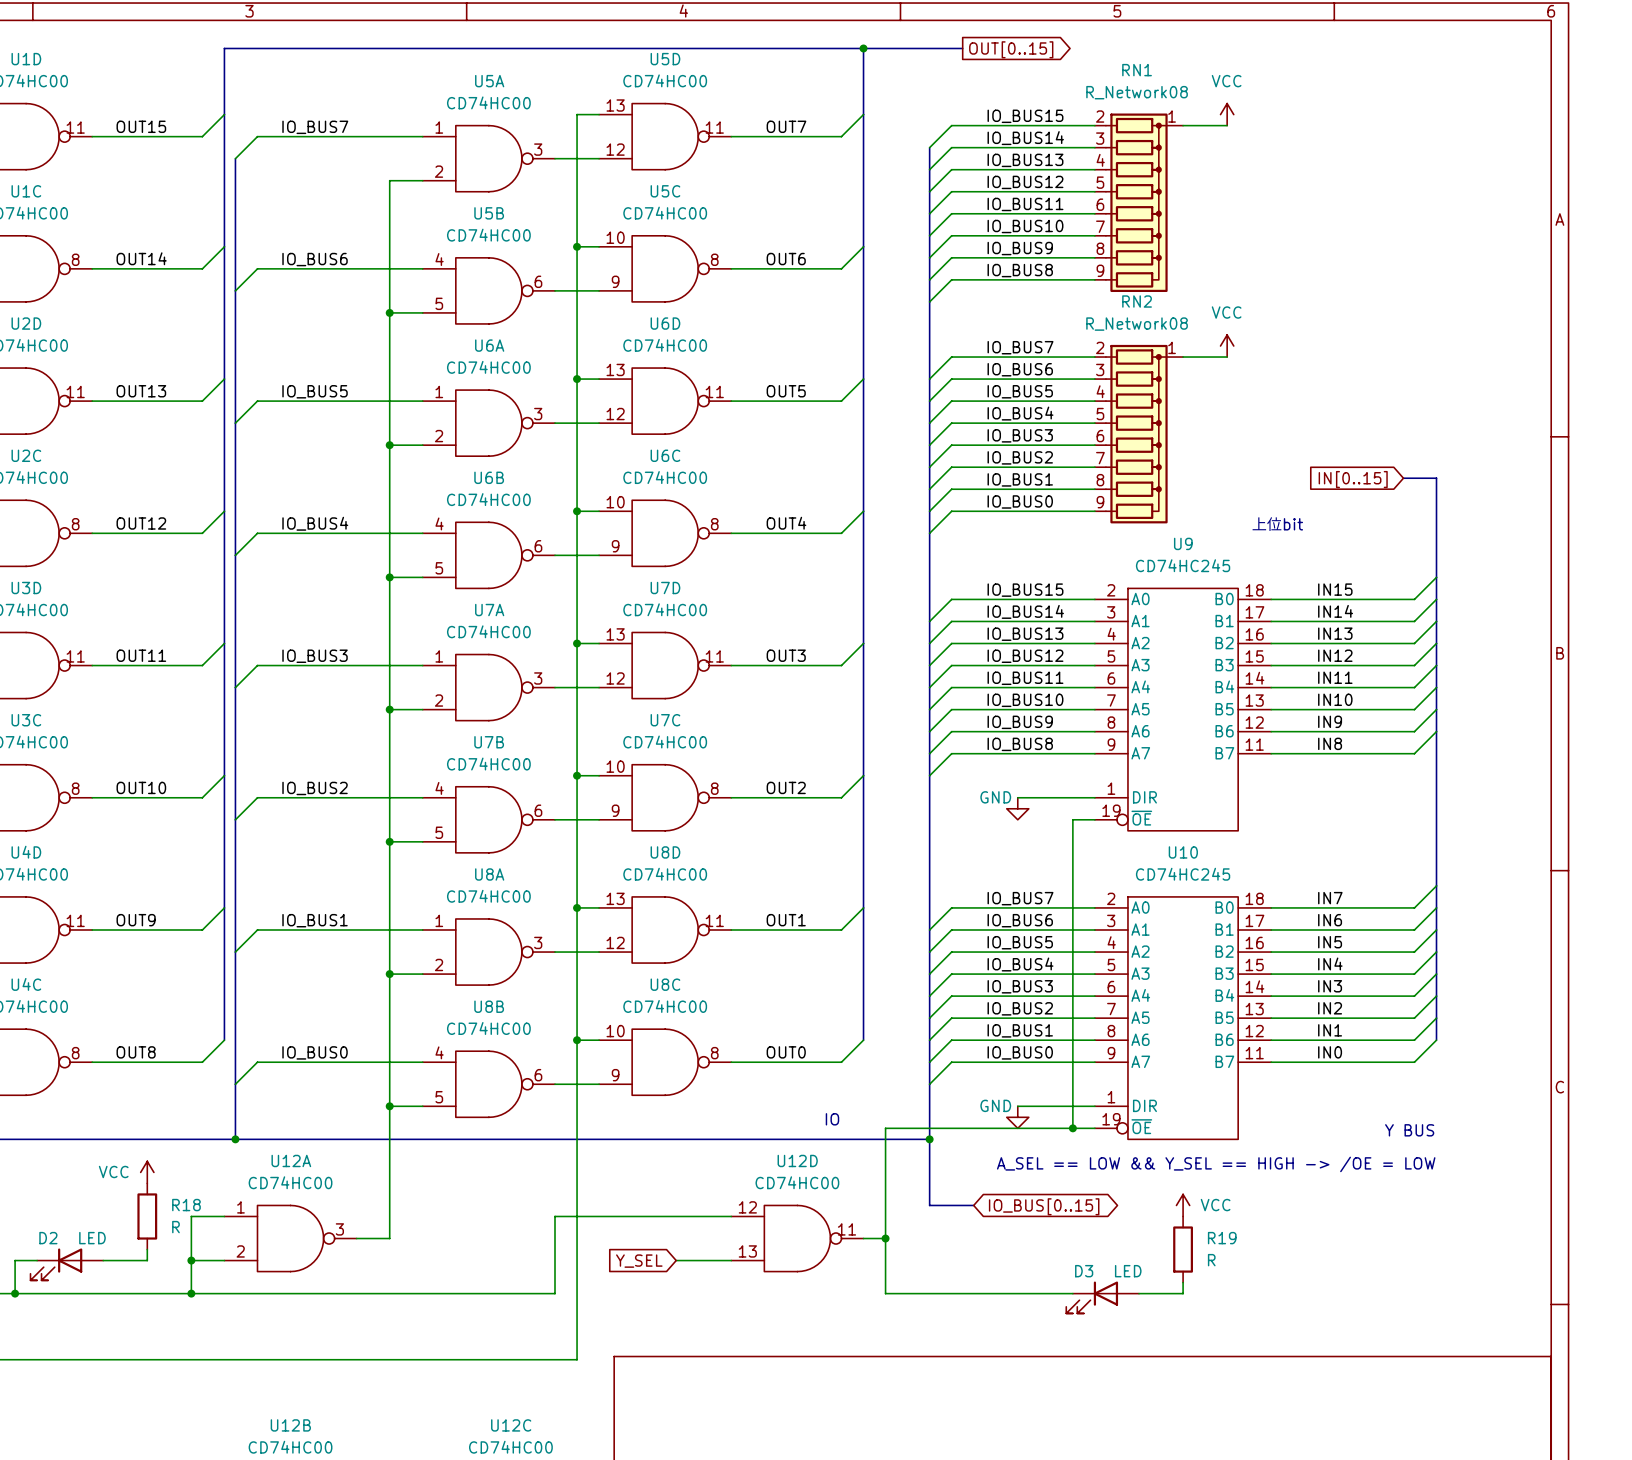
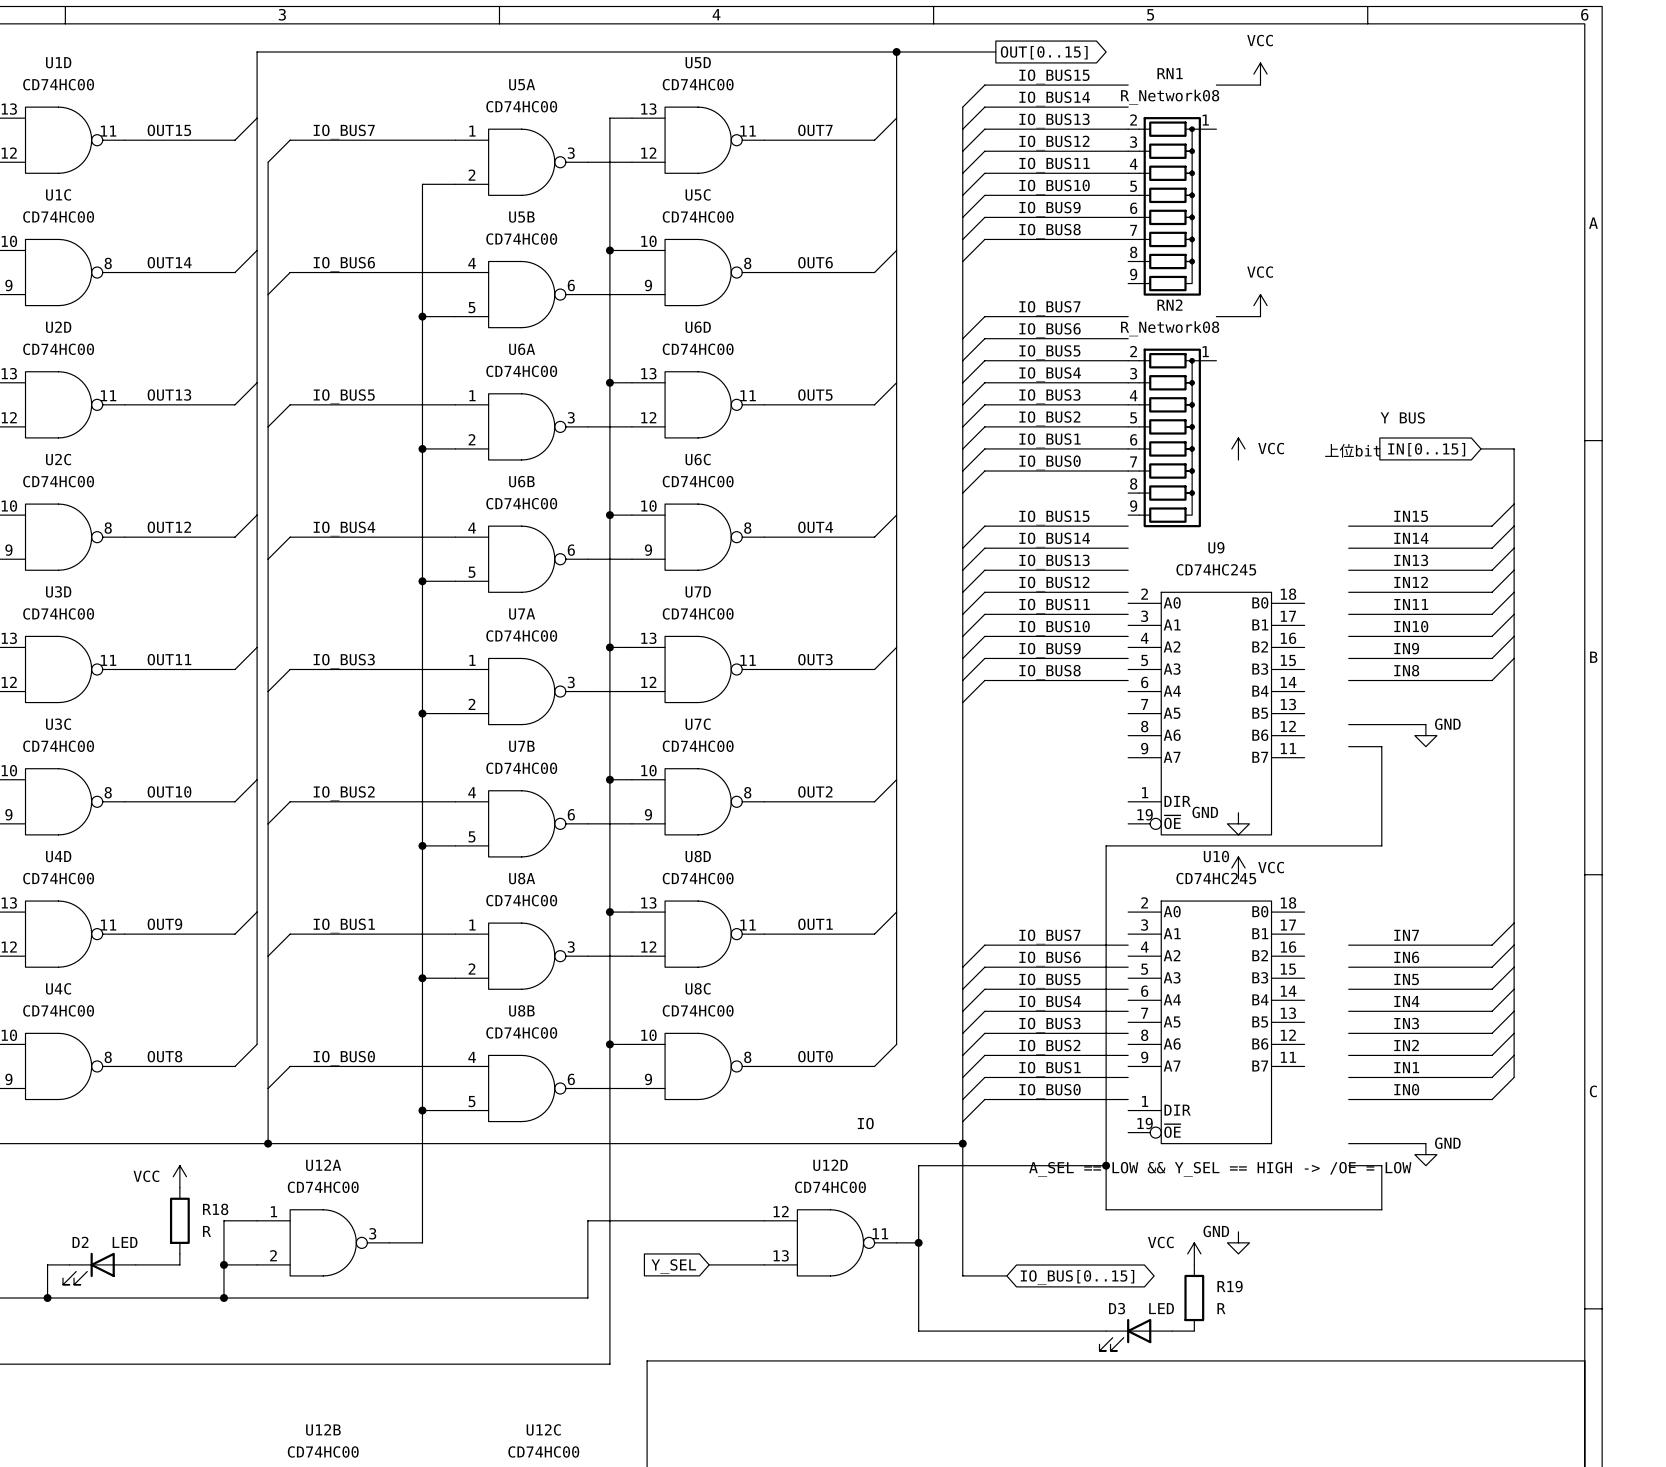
label: none -> IO_BUS15 (1054, 76)
wire: none -> (1128, 85) (984, 85) (962, 107)
wire: none -> (1216, 85) (1260, 85)
label: none -> IO_BUS14 (1054, 98)
bus: none -> (962, 107) (962, 151)
wire: none -> (1128, 107) (984, 107) (962, 129)
power symbol position: VCC (1227, 114) -> VCC (1260, 74)
label: IO_BUS15 (1025, 116) -> IO_BUS13 (1054, 121)
wire: (1183, 125) (1227, 125) -> (1216, 316) (1260, 316)
label: IO_BUS14 (1025, 138) -> IO_BUS12 (1054, 143)
label: IO_BUS13 (1025, 160) -> IO_BUS11 (1054, 165)
label: IO_BUS12 (1025, 182) -> IO_BUS10 (1054, 187)
label: IO_BUS11 (1025, 204) -> IO_BUS9 (1050, 209)
label: IO_BUS10 (1025, 226) -> IO_BUS8 (1050, 231)
label: IO_BUS9 (1020, 248) -> none
wire: (1094, 257) (951, 257) (929, 279) -> (1128, 338) (984, 338) (962, 360)
label: IO_BUS8 (1020, 270) -> none
wire: (1094, 279) (951, 279) (929, 301) -> (1128, 316) (984, 316) (962, 338)
label: none -> IO_BUS7 (1049, 308)
label: none -> IO_BUS6 (1050, 330)
power symbol position: VCC (1227, 345) -> VCC (1260, 305)
label: IO_BUS7 (1020, 347) -> IO_BUS5 (1049, 352)
wire: (1183, 357) (1227, 357) -> none
label: IO_BUS6 (1020, 369) -> IO_BUS4 (1050, 374)
label: IO_BUS5 (1020, 391) -> IO_BUS3 (1049, 396)
label: IO_BUS4 (1020, 413) -> IO_BUS2 (1049, 418)
text: none -> Y BUS (1402, 417)
label: IO_BUS3 (1020, 435) -> IO_BUS1 (1050, 440)
power symbol: none -> VCC (1238, 448)
bus: none -> (1481, 448) (1514, 448) (1514, 1077)
label: IO_BUS2 (1020, 457) -> IO_BUS0 (1050, 462)
bus: (1403, 478) (1436, 478) (1436, 1040) -> none
label: IO_BUS1 (1020, 479) -> none
global label position: IN[0..15] (1353, 479) -> IN[0..15] (1426, 449)
wire: (1094, 489) (951, 489) (929, 511) -> (1128, 526) (984, 526) (962, 548)
wire: none -> (1514, 504) (1492, 526) (1348, 526)
label: IO_BUS0 (1020, 501) -> none
wire: (1094, 511) (951, 511) (929, 533) -> (1128, 548) (984, 548) (962, 570)
text position: 上位bit (1277, 524) -> 上位bit (1352, 450)
wire: (1436, 577) (1414, 599) (1271, 599) -> (1514, 570) (1492, 592) (1348, 592)
label position: IN15 (1335, 589) -> IN15 (1411, 516)
label position: IO_BUS15 (1025, 590) -> IO_BUS15 (1054, 517)
wire: (1094, 599) (951, 599) (929, 621) -> (1128, 636) (984, 636) (962, 658)
wire: (1436, 599) (1414, 621) (1271, 621) -> (1514, 592) (1492, 614) (1348, 614)
label position: IO_BUS14 (1025, 611) -> IO_BUS14 (1054, 540)
label position: IN14 (1335, 611) -> IN14 (1411, 538)
wire: (1094, 621) (951, 621) (929, 643) -> (1128, 658) (984, 658) (962, 680)
wire: (1436, 621) (1414, 643) (1271, 643) -> (1514, 614) (1492, 636) (1348, 636)
label position: IN13 (1335, 633) -> IN13 (1411, 560)
label position: IO_BUS13 (1025, 634) -> IO_BUS13 (1054, 562)
wire: (1094, 643) (951, 643) (929, 665) -> (1128, 680) (984, 680) (962, 702)
wire: (1436, 643) (1414, 665) (1271, 665) -> (1514, 636) (1492, 658) (1348, 658)
label position: IN12 (1335, 655) -> IN12 (1411, 582)
label position: IO_BUS12 (1025, 656) -> IO_BUS12 (1054, 584)
wire: (1094, 665) (951, 665) (929, 687) -> (1128, 614) (984, 614) (962, 636)
wire: (1436, 665) (1414, 687) (1271, 687) -> (1514, 658) (1492, 680) (1348, 680)
label position: IN11 (1335, 677) -> IN11 (1411, 604)
label position: IO_BUS11 (1025, 678) -> IO_BUS11 (1054, 606)
wire: (1094, 687) (951, 687) (929, 709) -> (1128, 592) (984, 592) (962, 614)
wire: (1436, 687) (1414, 709) (1271, 709) -> (1514, 548) (1492, 570) (1348, 570)
label position: IN10 (1335, 699) -> IN10 (1411, 626)
label position: IO_BUS10 (1025, 700) -> IO_BUS10 (1054, 628)
wire: (1094, 709) (951, 709) (929, 731) -> (1128, 570) (984, 570) (962, 592)
wire: (1436, 709) (1414, 731) (1271, 731) -> (1514, 526) (1492, 548) (1348, 548)
wire: none -> (1348, 724) (1425, 724)
label position: IN9 (1330, 721) -> IN9 (1406, 648)
label position: IO_BUS9 (1020, 722) -> IO_BUS9 (1050, 650)
wire: (1094, 731) (951, 731) (929, 753) -> none
power symbol: none -> GND (1425, 735)
wire: (1436, 731) (1414, 753) (1271, 753) -> none
label position: IN8 (1330, 743) -> IN8 (1406, 670)
label position: IO_BUS8 (1020, 744) -> IO_BUS8 (1050, 672)
wire: (1094, 753) (951, 753) (929, 775) -> none
wire: (1017, 797) (1094, 797) -> none
power symbol: GND (1017, 808) -> none
wire: (1094, 819) (1072, 819) (1072, 841) -> (1348, 746) (1381, 746) (1381, 845) (1106, 845)
power symbol: none -> GND (1238, 823)
power symbol: none -> VCC (1238, 867)
wire: (1436, 885) (1414, 907) (1271, 907) -> (1514, 1077) (1492, 1099) (1348, 1099)
label position: IO_BUS7 (1020, 898) -> IO_BUS7 (1049, 936)
label position: IN7 (1330, 898) -> IN7 (1406, 935)
wire: (1094, 907) (951, 907) (929, 929) -> (1128, 945) (984, 945) (962, 967)
wire: (1436, 907) (1414, 929) (1271, 929) -> (1514, 923) (1492, 945) (1348, 945)
label position: IO_BUS6 (1020, 920) -> IO_BUS6 (1050, 959)
label position: IN6 (1330, 920) -> IN6 (1406, 957)
wire: (1094, 929) (951, 929) (929, 952) -> (1128, 967) (984, 967) (962, 989)
wire: (1436, 929) (1414, 952) (1271, 952) -> (1514, 1033) (1492, 1055) (1348, 1055)
label position: IO_BUS5 (1020, 942) -> IO_BUS5 (1049, 981)
label position: IN5 (1330, 942) -> IN5 (1406, 979)
wire: (1094, 952) (951, 952) (929, 974) -> (1128, 989) (984, 989) (962, 1011)
wire: (1436, 952) (1414, 974) (1271, 974) -> (1514, 945) (1492, 967) (1348, 967)
label position: IN4 (1330, 963) -> IN4 (1406, 1001)
label position: IO_BUS4 (1020, 964) -> IO_BUS4 (1050, 1003)
wire: (1094, 974) (951, 974) (929, 996) -> (1128, 1011) (984, 1011) (962, 1033)
wire: (1436, 974) (1414, 996) (1271, 996) -> (1514, 967) (1492, 989) (1348, 989)
label position: IO_BUS3 (1020, 986) -> IO_BUS3 (1049, 1025)
label position: IN3 (1330, 986) -> IN3 (1406, 1023)
wire: (1094, 996) (951, 996) (929, 1018) -> (1128, 1033) (984, 1033) (962, 1055)
wire: (1436, 996) (1414, 1018) (1271, 1018) -> (1514, 989) (1492, 1011) (1348, 1011)
label position: IO_BUS2 (1020, 1008) -> IO_BUS2 (1049, 1047)
label position: IN2 (1330, 1008) -> IN2 (1406, 1045)
wire: (1094, 1018) (951, 1018) (929, 1040) -> (1128, 1055) (984, 1055) (962, 1077)
wire: (1436, 1018) (1414, 1040) (1271, 1040) -> (1514, 1011) (1492, 1033) (1348, 1033)
label position: IO_BUS1 (1020, 1030) -> IO_BUS1 (1050, 1069)
label position: IN1 (1330, 1030) -> IN1 (1406, 1067)
wire: (1094, 1040) (951, 1040) (929, 1062) -> (1128, 1077) (984, 1077) (962, 1099)
wire: (1436, 1040) (1414, 1062) (1271, 1062) -> (1514, 1055) (1492, 1077) (1348, 1077)
label position: IO_BUS0 (1020, 1052) -> IO_BUS0 (1050, 1091)
label position: IN0 (1330, 1052) -> IN0 (1406, 1089)
wire: (1094, 1062) (951, 1062) (929, 1084) -> (1128, 1099) (984, 1099) (962, 1121)
wire: (1017, 1106) (1094, 1106) -> none
power symbol: GND (1017, 1117) -> none
wire: none -> (1106, 1132) (1106, 1209) (1381, 1209) (1381, 1165) (1348, 1165)
junction position: (1072, 1128) -> (1106, 1165)
wire: (1094, 1128) (885, 1128) (885, 1161) -> (1106, 1165) (918, 1165)
text: Y BUS (1409, 1130) -> none
wire: none -> (1348, 1143) (1425, 1143)
power symbol: none -> GND (1425, 1154)
bus: (929, 1205) (973, 1205) -> (962, 1209) (962, 1275) (1006, 1275)
power symbol position: VCC (1183, 1205) -> VCC (1194, 1253)
power symbol text position: VCC (1215, 1205) -> VCC (1160, 1242)
global label position: IO_BUS[0..15] (1044, 1206) -> IO_BUS[0..15] (1077, 1277)
power symbol: none -> GND (1238, 1242)
R19 position: (1183, 1249) -> (1194, 1298)
wire: (1183, 1282) (1183, 1293) (1138, 1293) -> none
wire: (885, 1293) (1072, 1293) -> (918, 1298) (918, 1331) (1106, 1331)
D3 position: (1102, 1297) -> (1135, 1334)
wire: none -> (1172, 1331) (1194, 1331)

